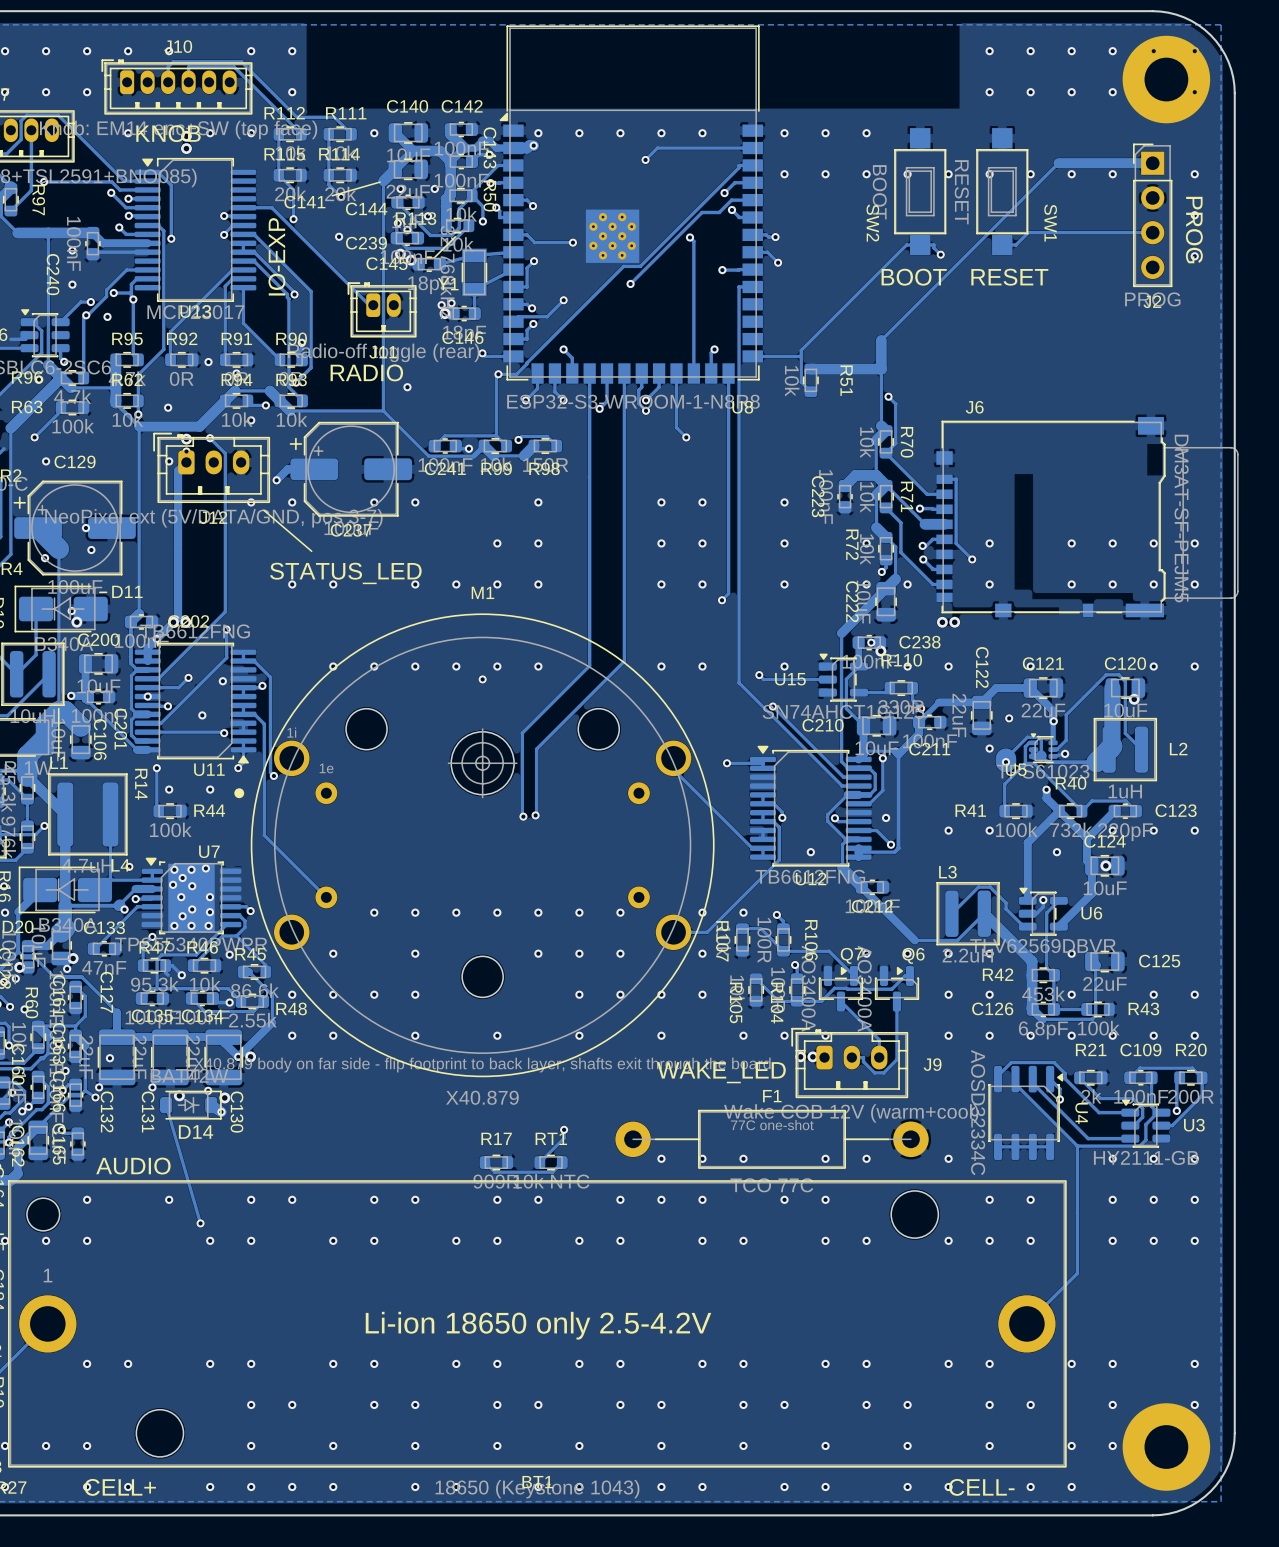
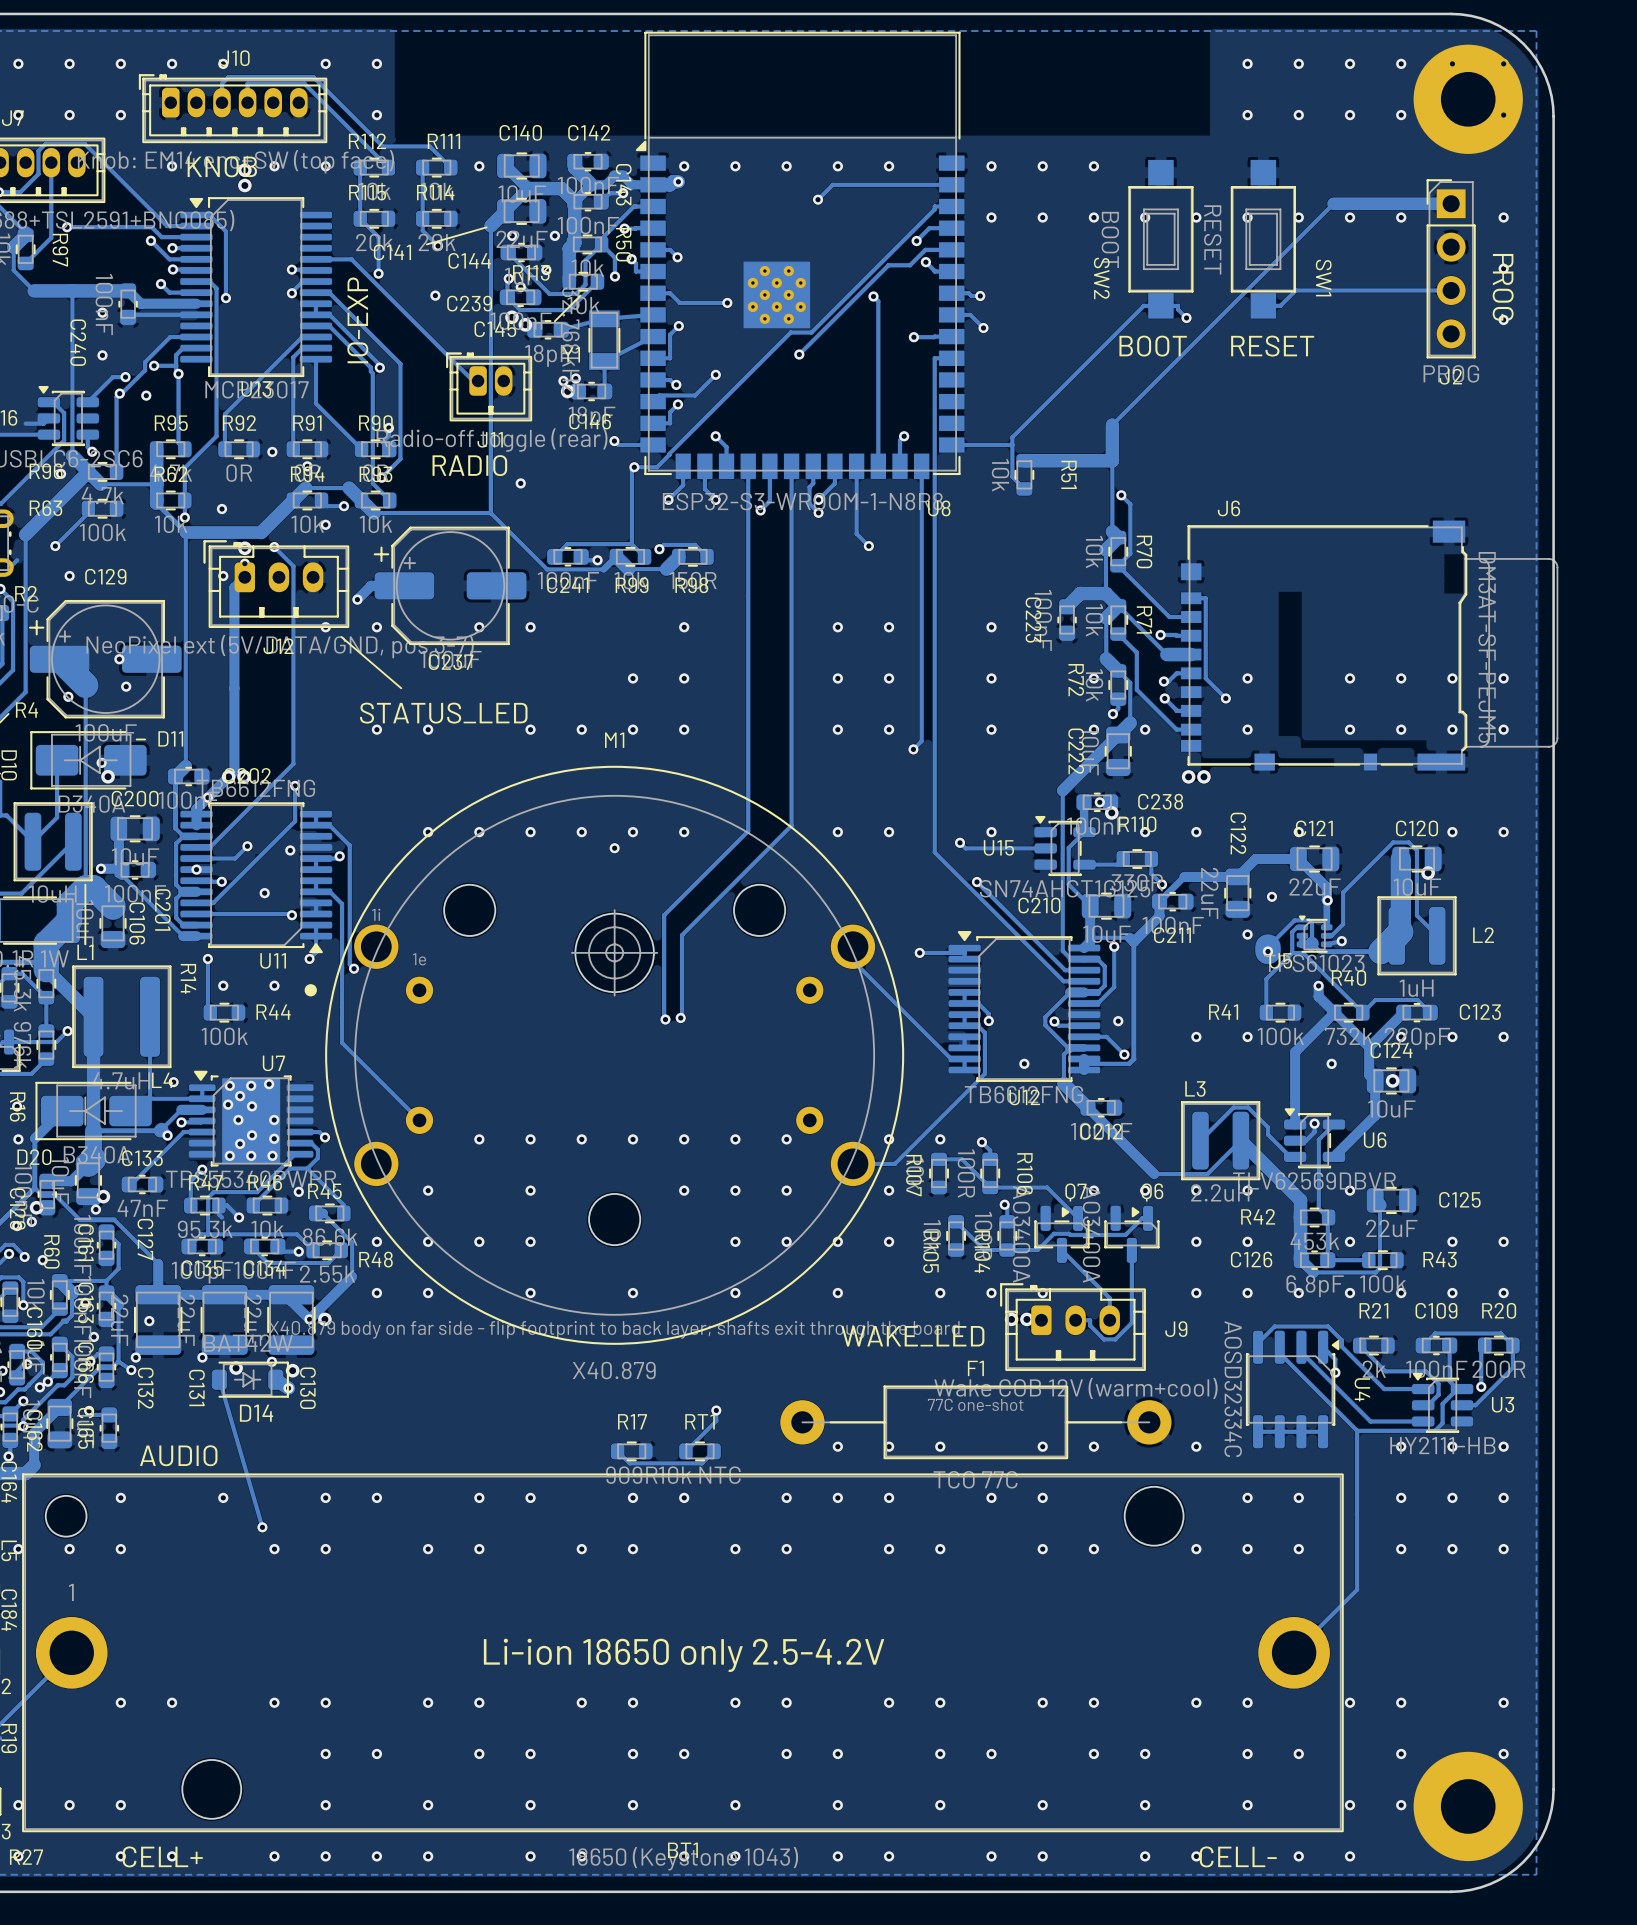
U3 value: HY2111-GB (1146, 1157) -> HY2111-HB (1442, 1445)

